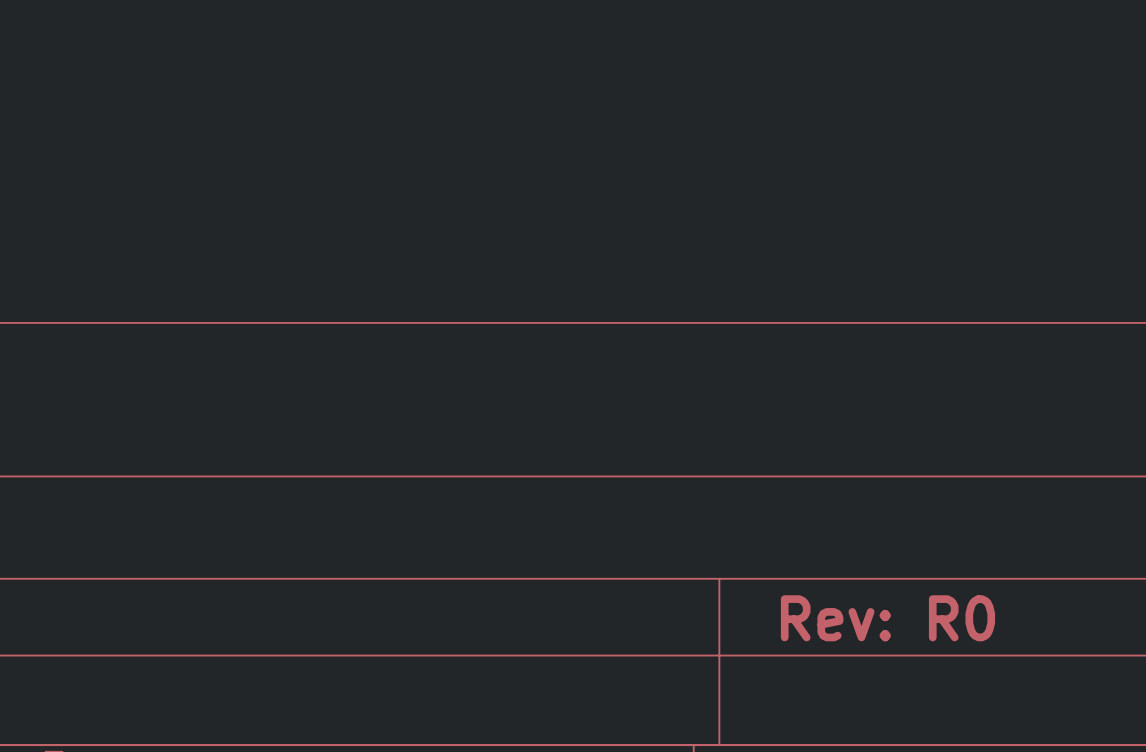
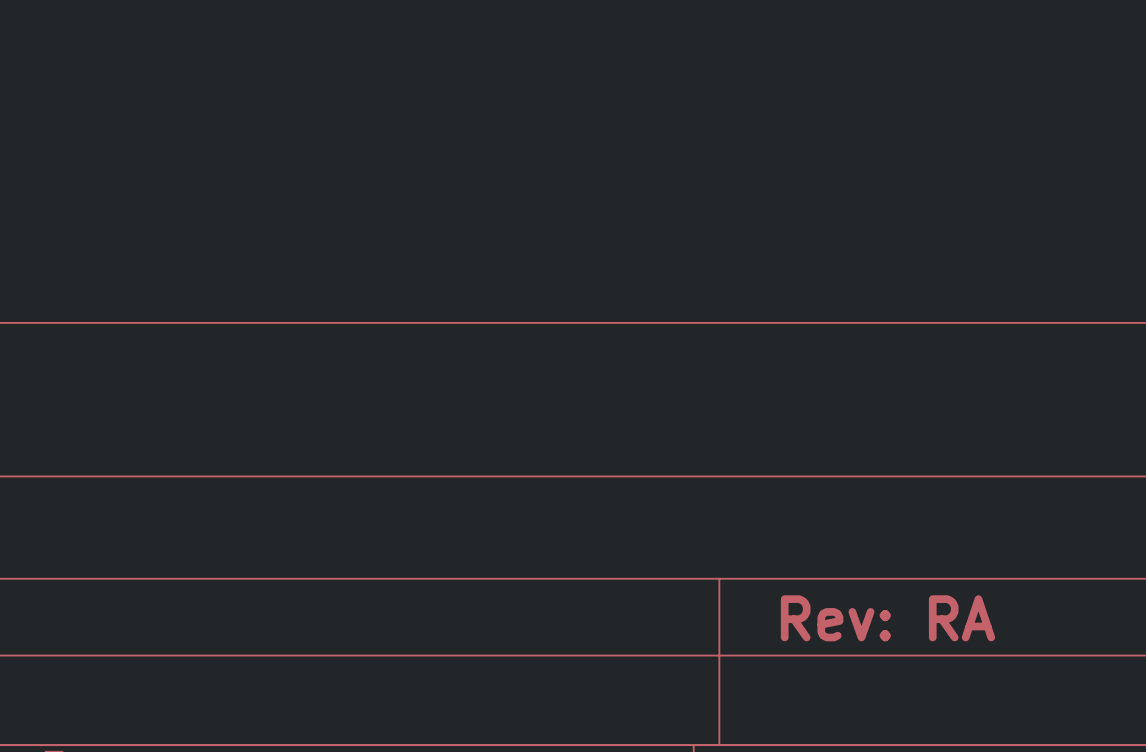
title block: Rev: R0 (887, 618) -> Rev: RA (887, 618)

